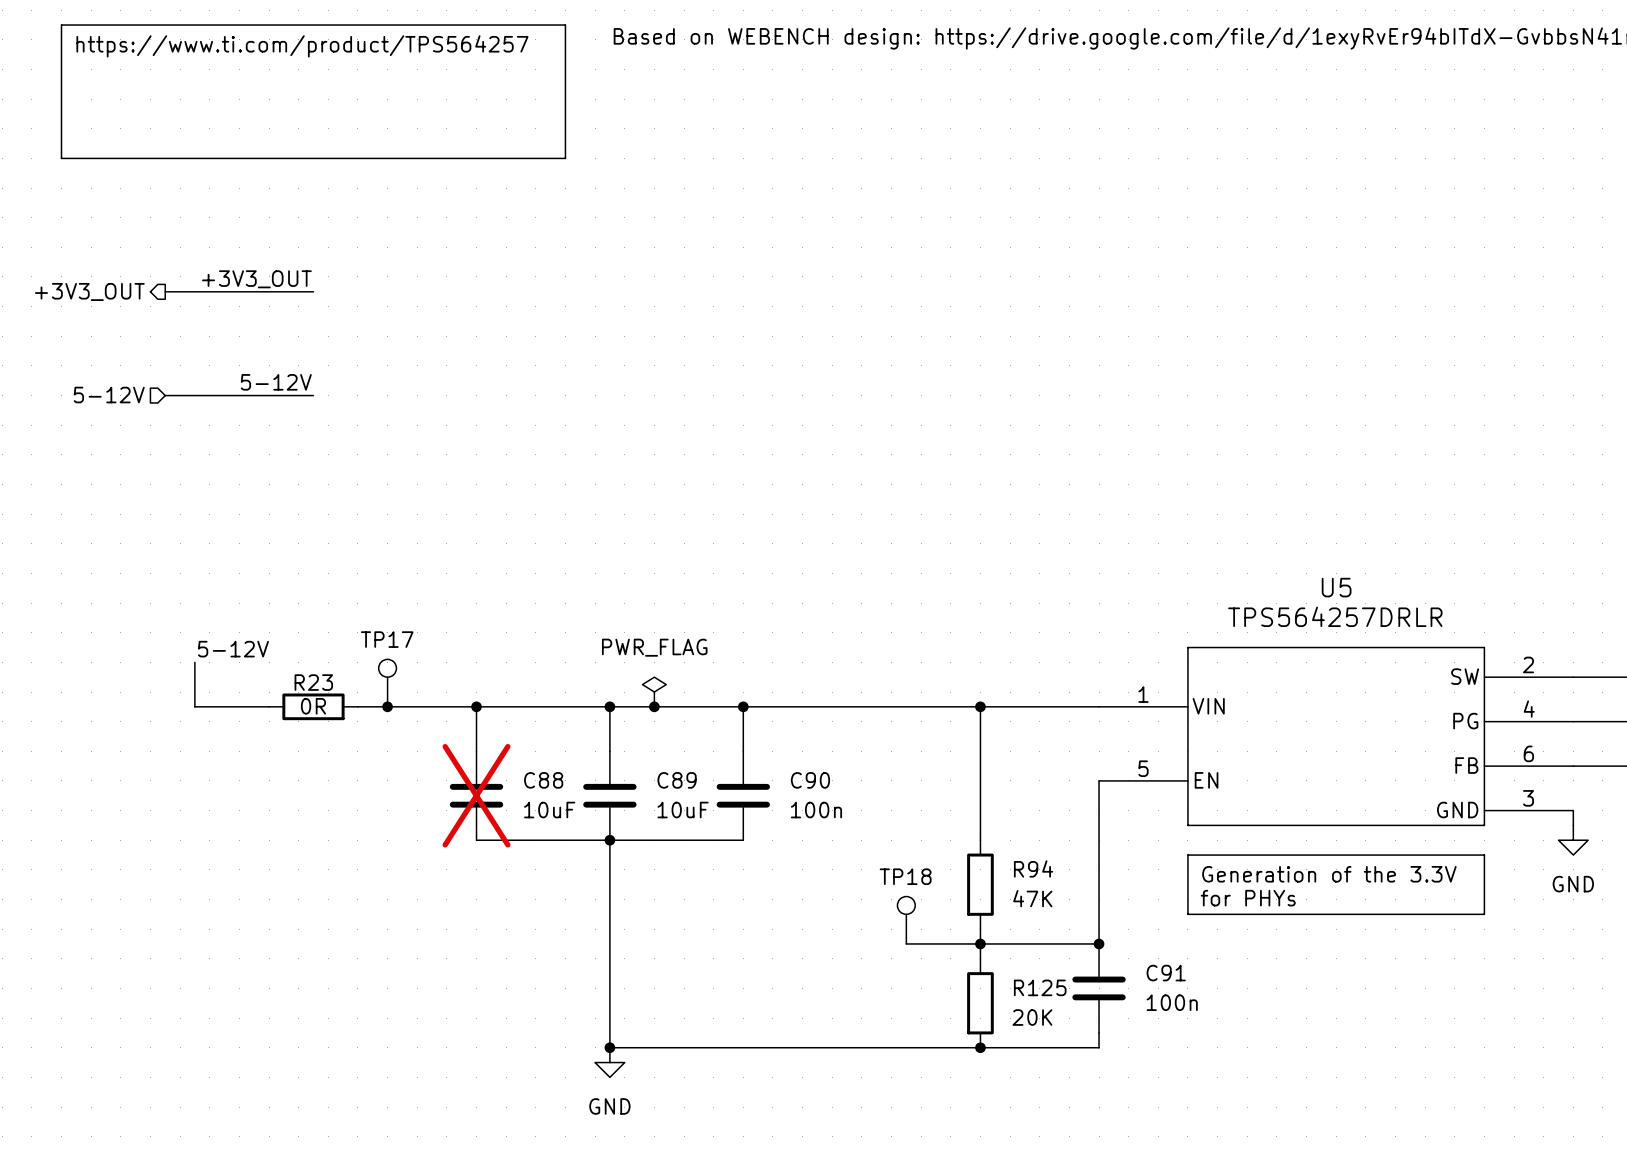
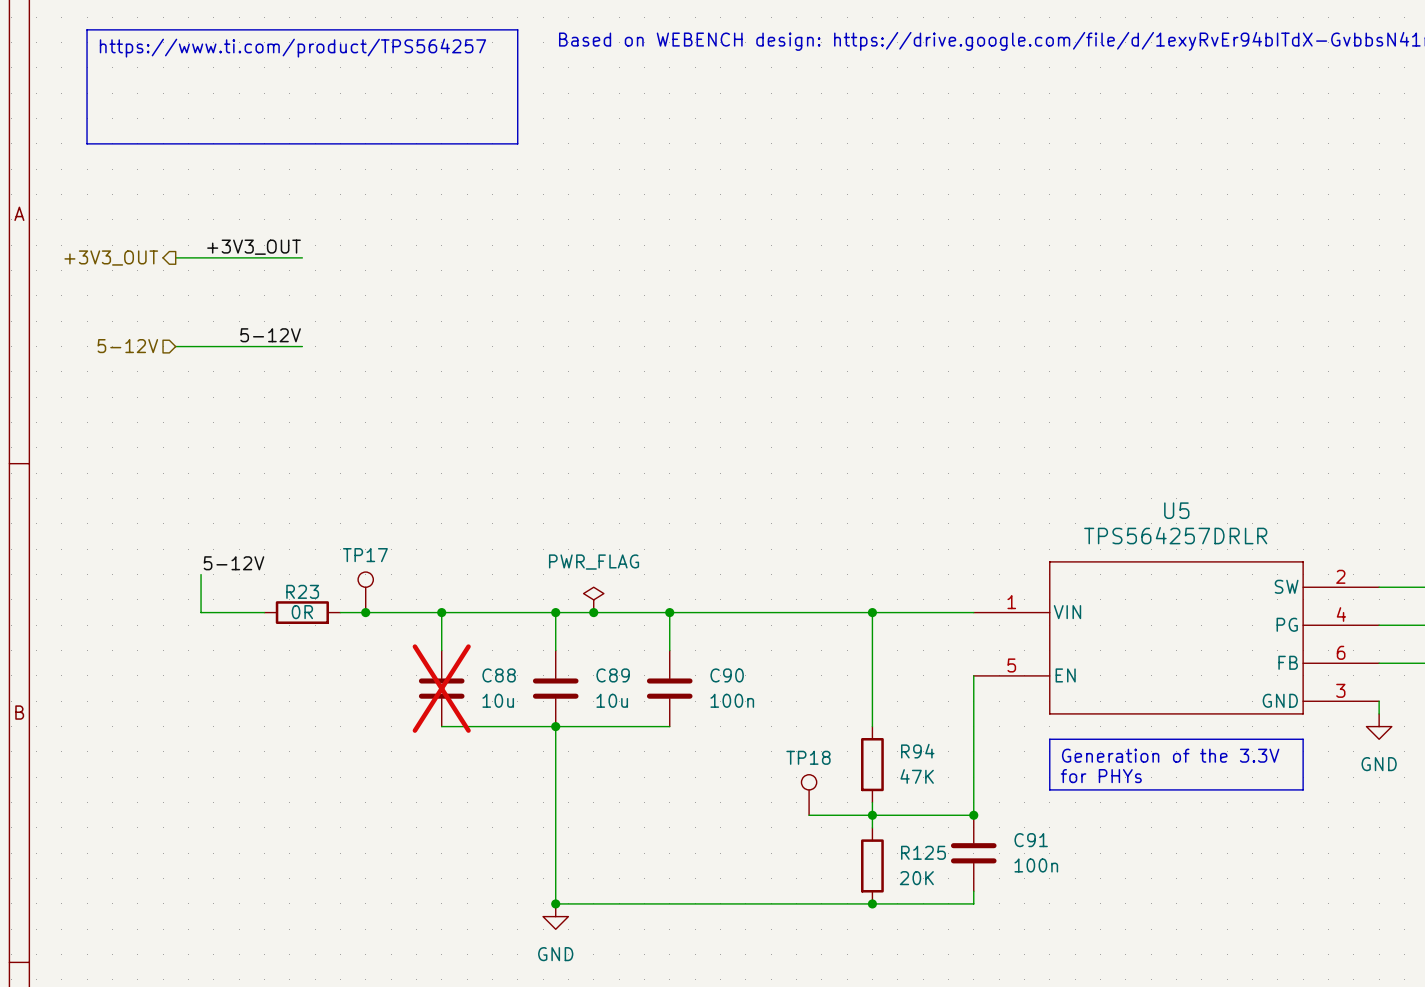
C88 value: 10uF (549, 810) -> 10u (498, 700)
C89 value: 10uF (683, 810) -> 10u (612, 700)

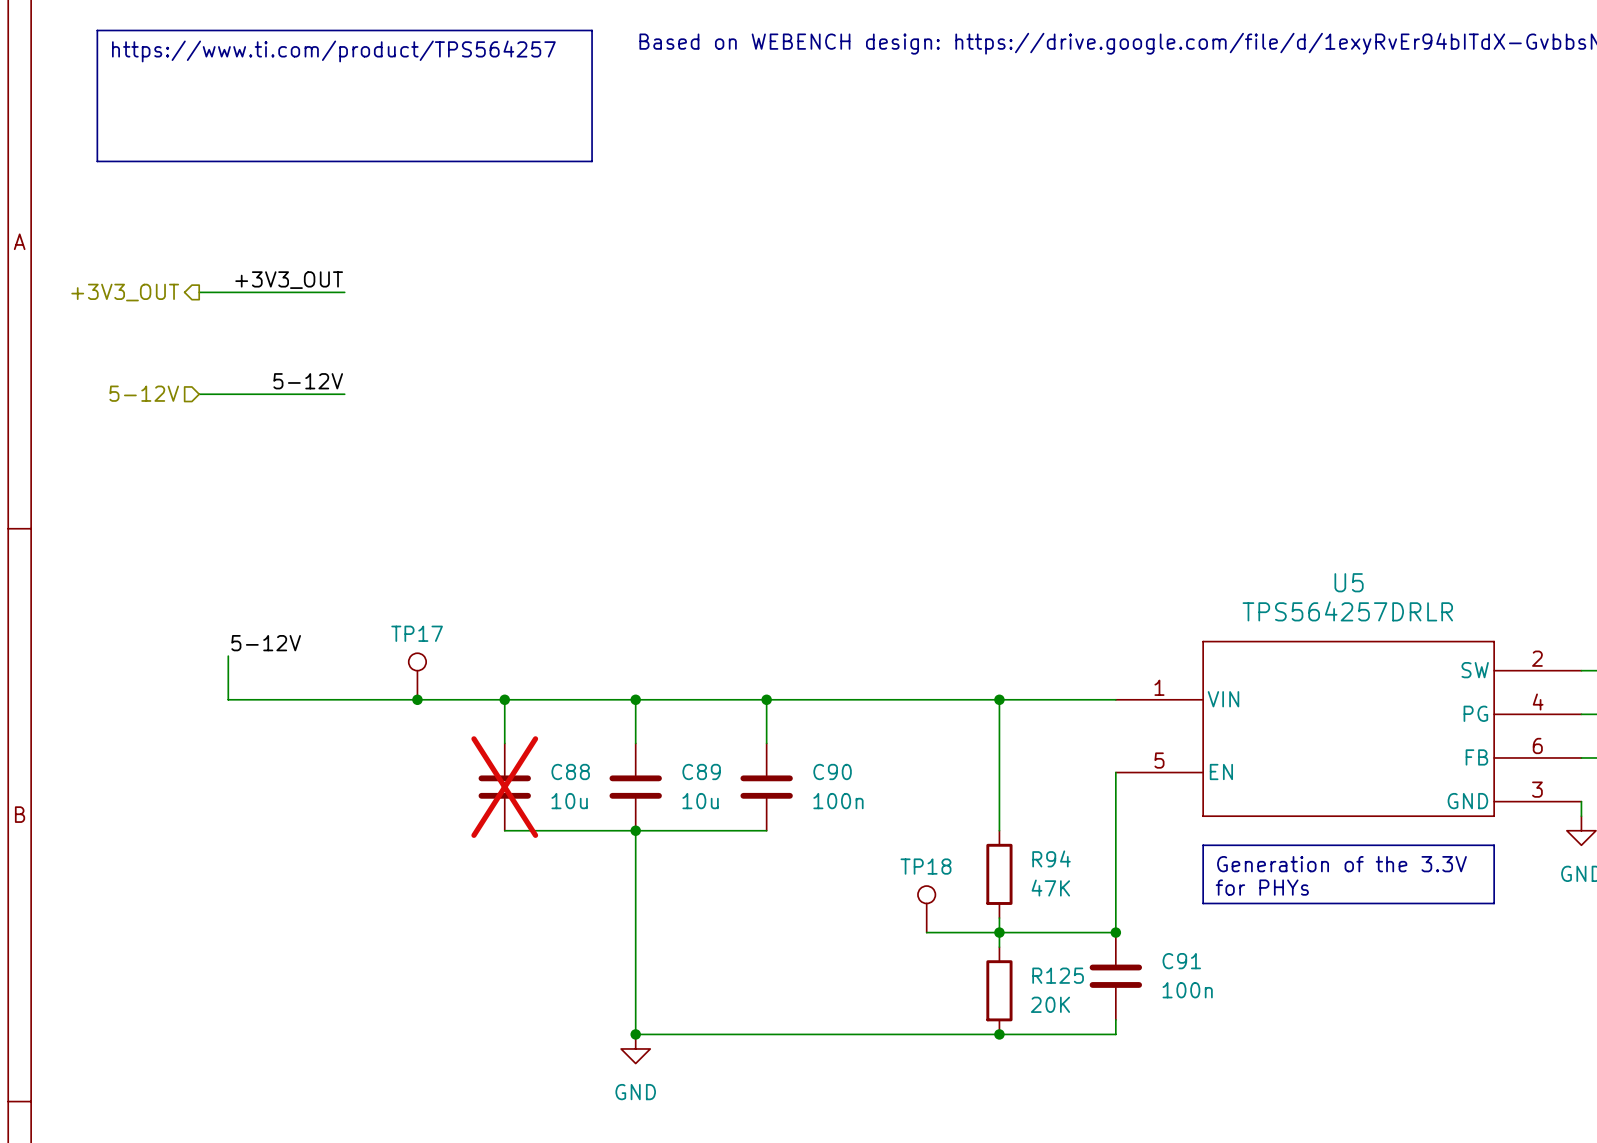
power symbol: PWR_FLAG (593, 599) -> none
wire: none -> (301, 699) (388, 699)
R23: 0R (302, 612) -> none
junction: (593, 612) -> none

